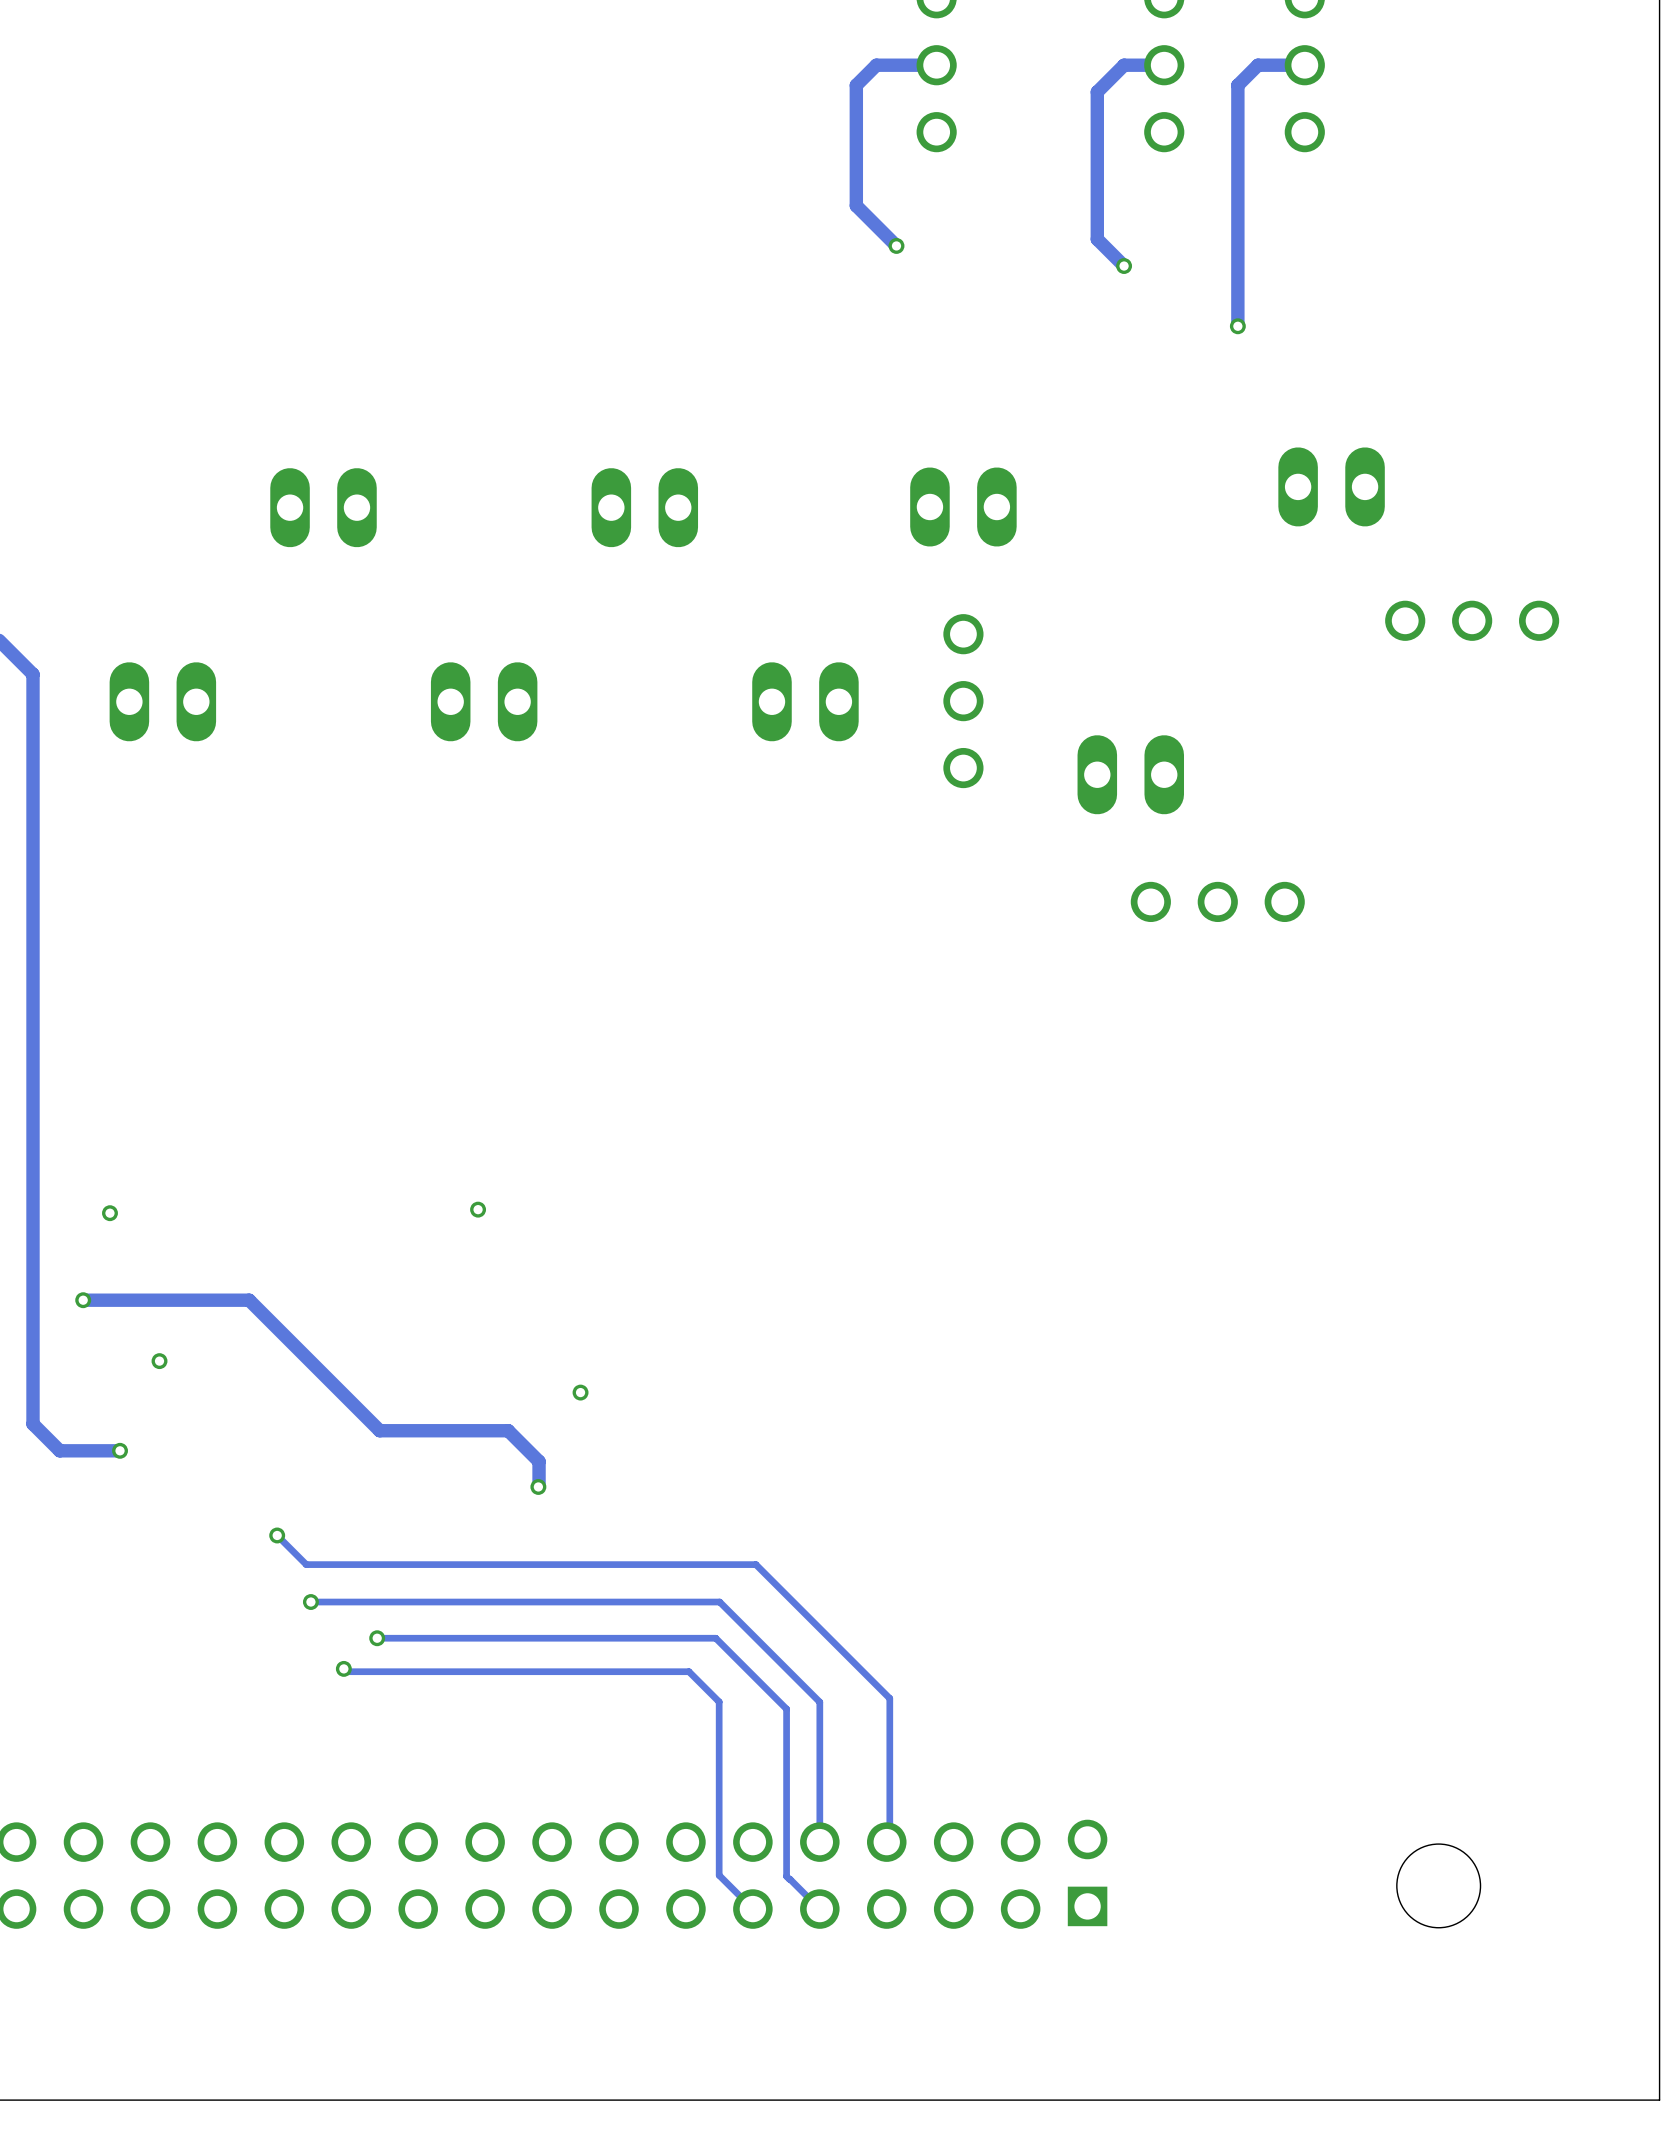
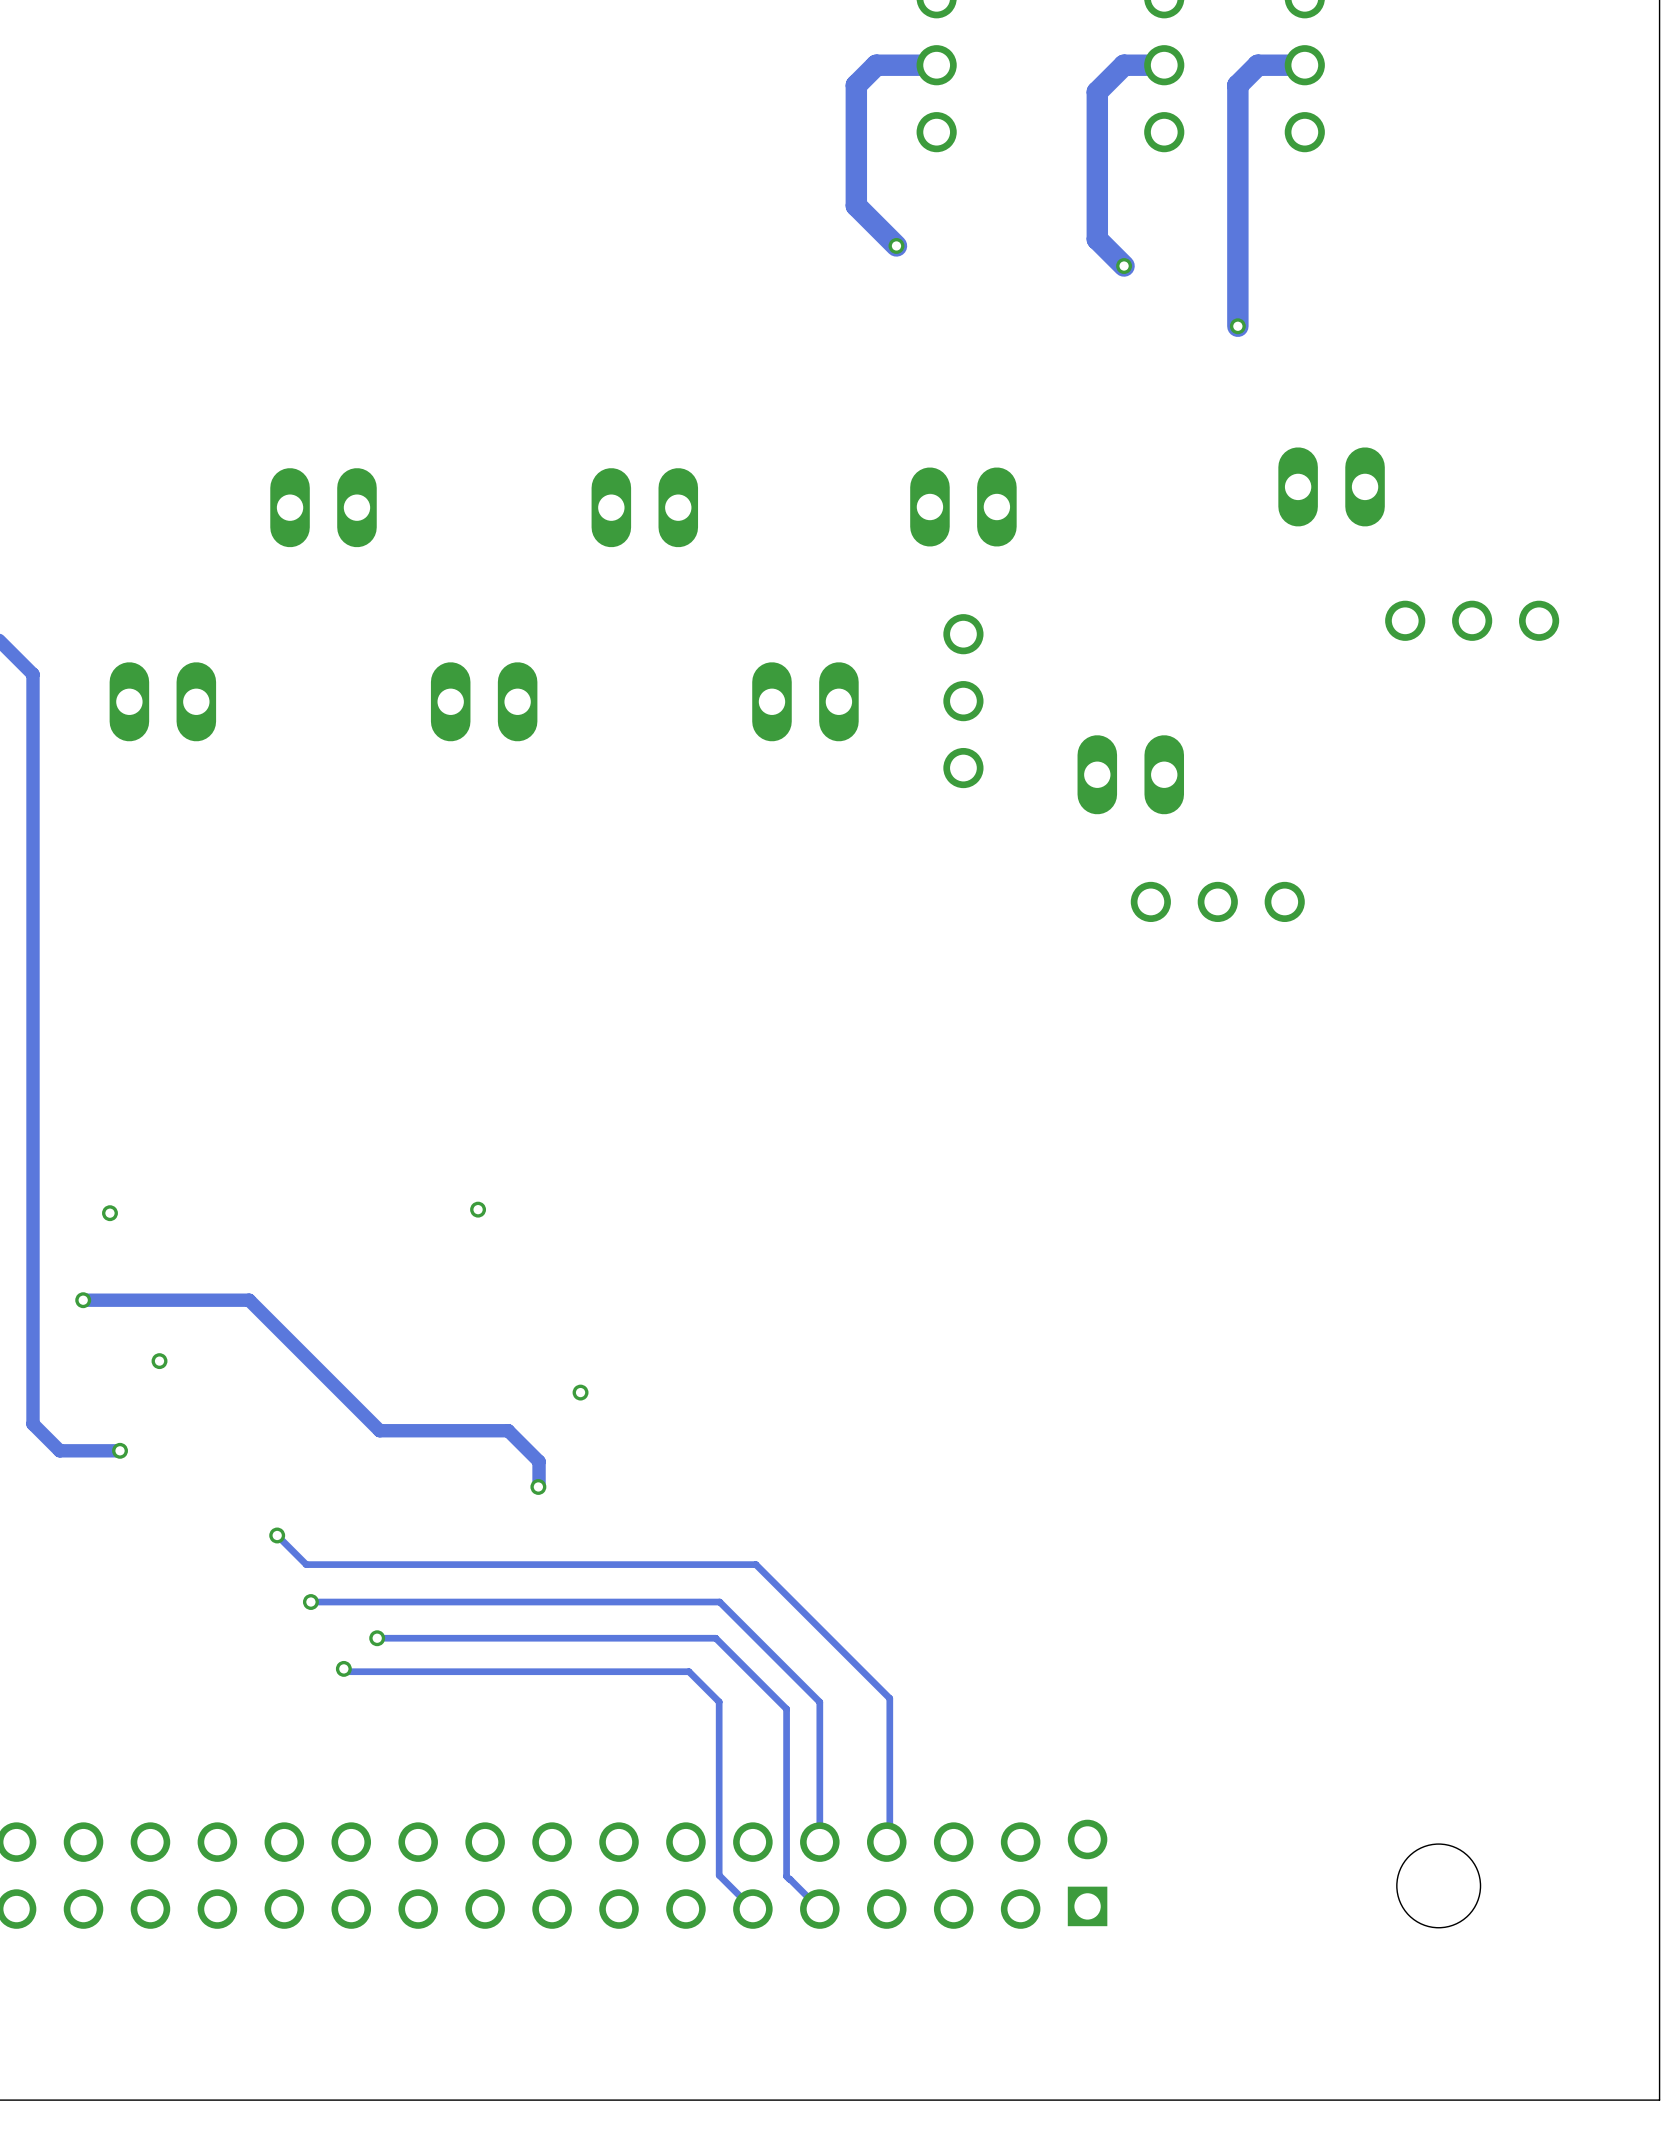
track width: thin (936, 65) (876, 65) (856, 85) (856, 205) (896, 245) -> thick (936, 65) (876, 65) (856, 85) (856, 205) (896, 245)
track width: thin (1164, 65) (1124, 65) (1097, 91) (1097, 239) (1124, 266) -> thick (1164, 65) (1124, 65) (1097, 91) (1097, 239) (1124, 266)
track width: thin (1304, 65) (1257, 65) (1237, 85) (1237, 326) -> thick (1304, 65) (1257, 65) (1237, 85) (1237, 326)

